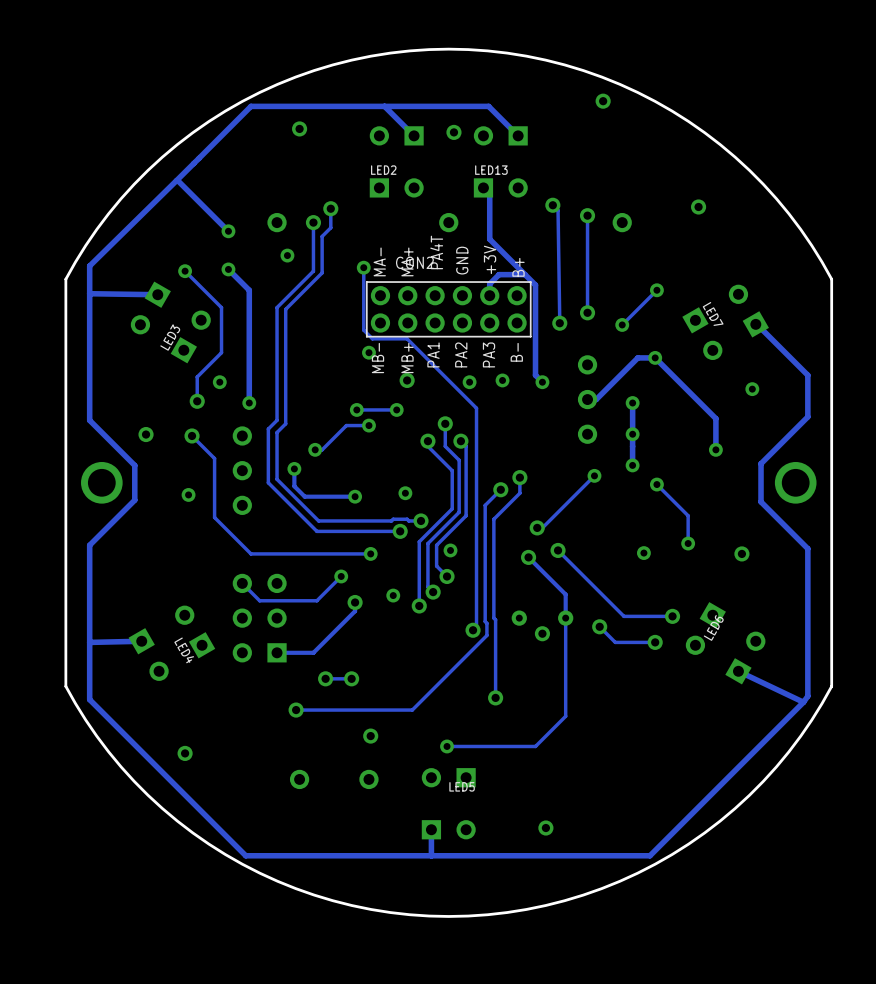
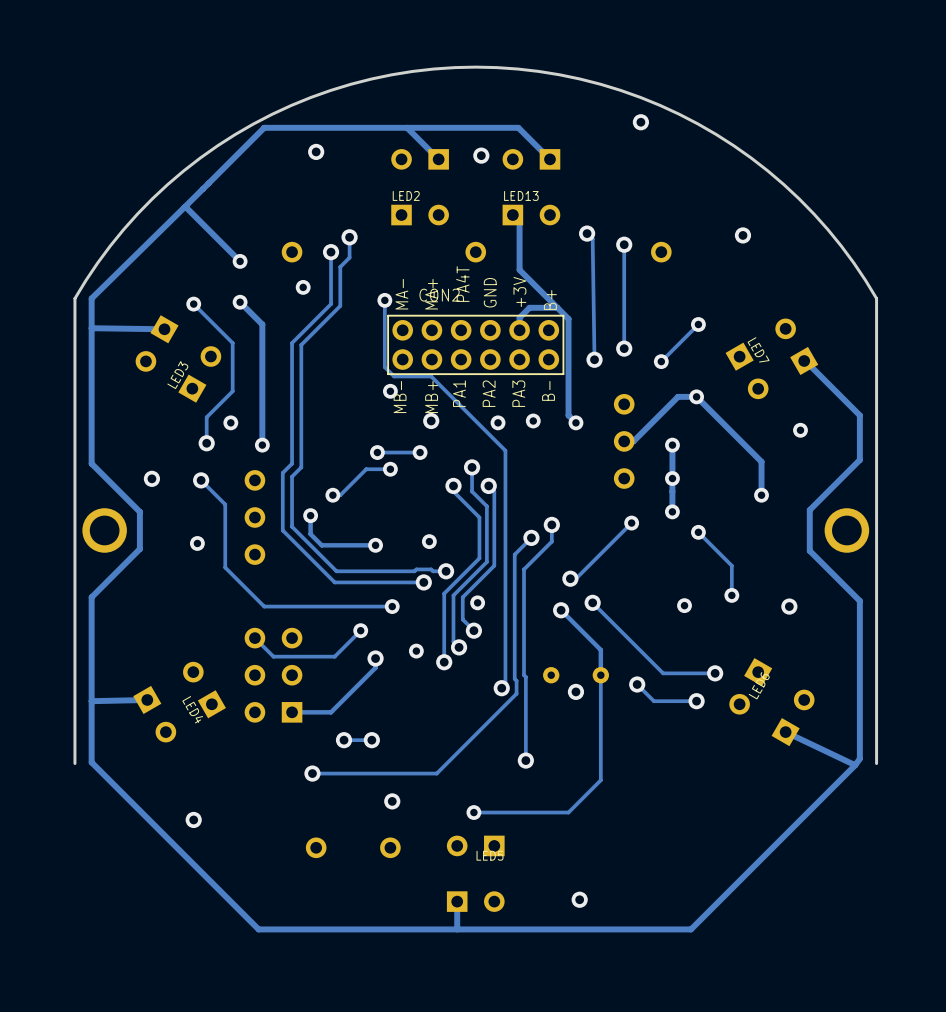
board edge: (831, 279) (831, 686) (811, 720) (788, 751) (749, 795) (704, 832) (655, 864) (619, 881) (583, 895) (545, 905) (487, 914) (448, 916) (409, 914) (351, 905) (314, 895) (277, 881) (242, 864) (208, 844) (177, 821) (147, 795) (108, 751) (85, 720) (65, 686) (65, 279) (85, 245) (108, 213) (147, 170) (192, 132) (242, 101) (277, 84) (314, 70) (351, 60) (409, 50) (448, 49) (487, 50) (545, 60) (583, 70) (619, 84) (655, 101) (688, 121) (720, 144) (749, 170) (788, 213) (811, 245) (831, 279) -> none
board edge: none -> (876, 763) (876, 298) (841, 246) (814, 214) (767, 170) (716, 134) (660, 105) (600, 84) (538, 71) (475, 67) (412, 71) (350, 84) (291, 105) (235, 134) (183, 170) (137, 214) (110, 246) (74, 298) (74, 763)

